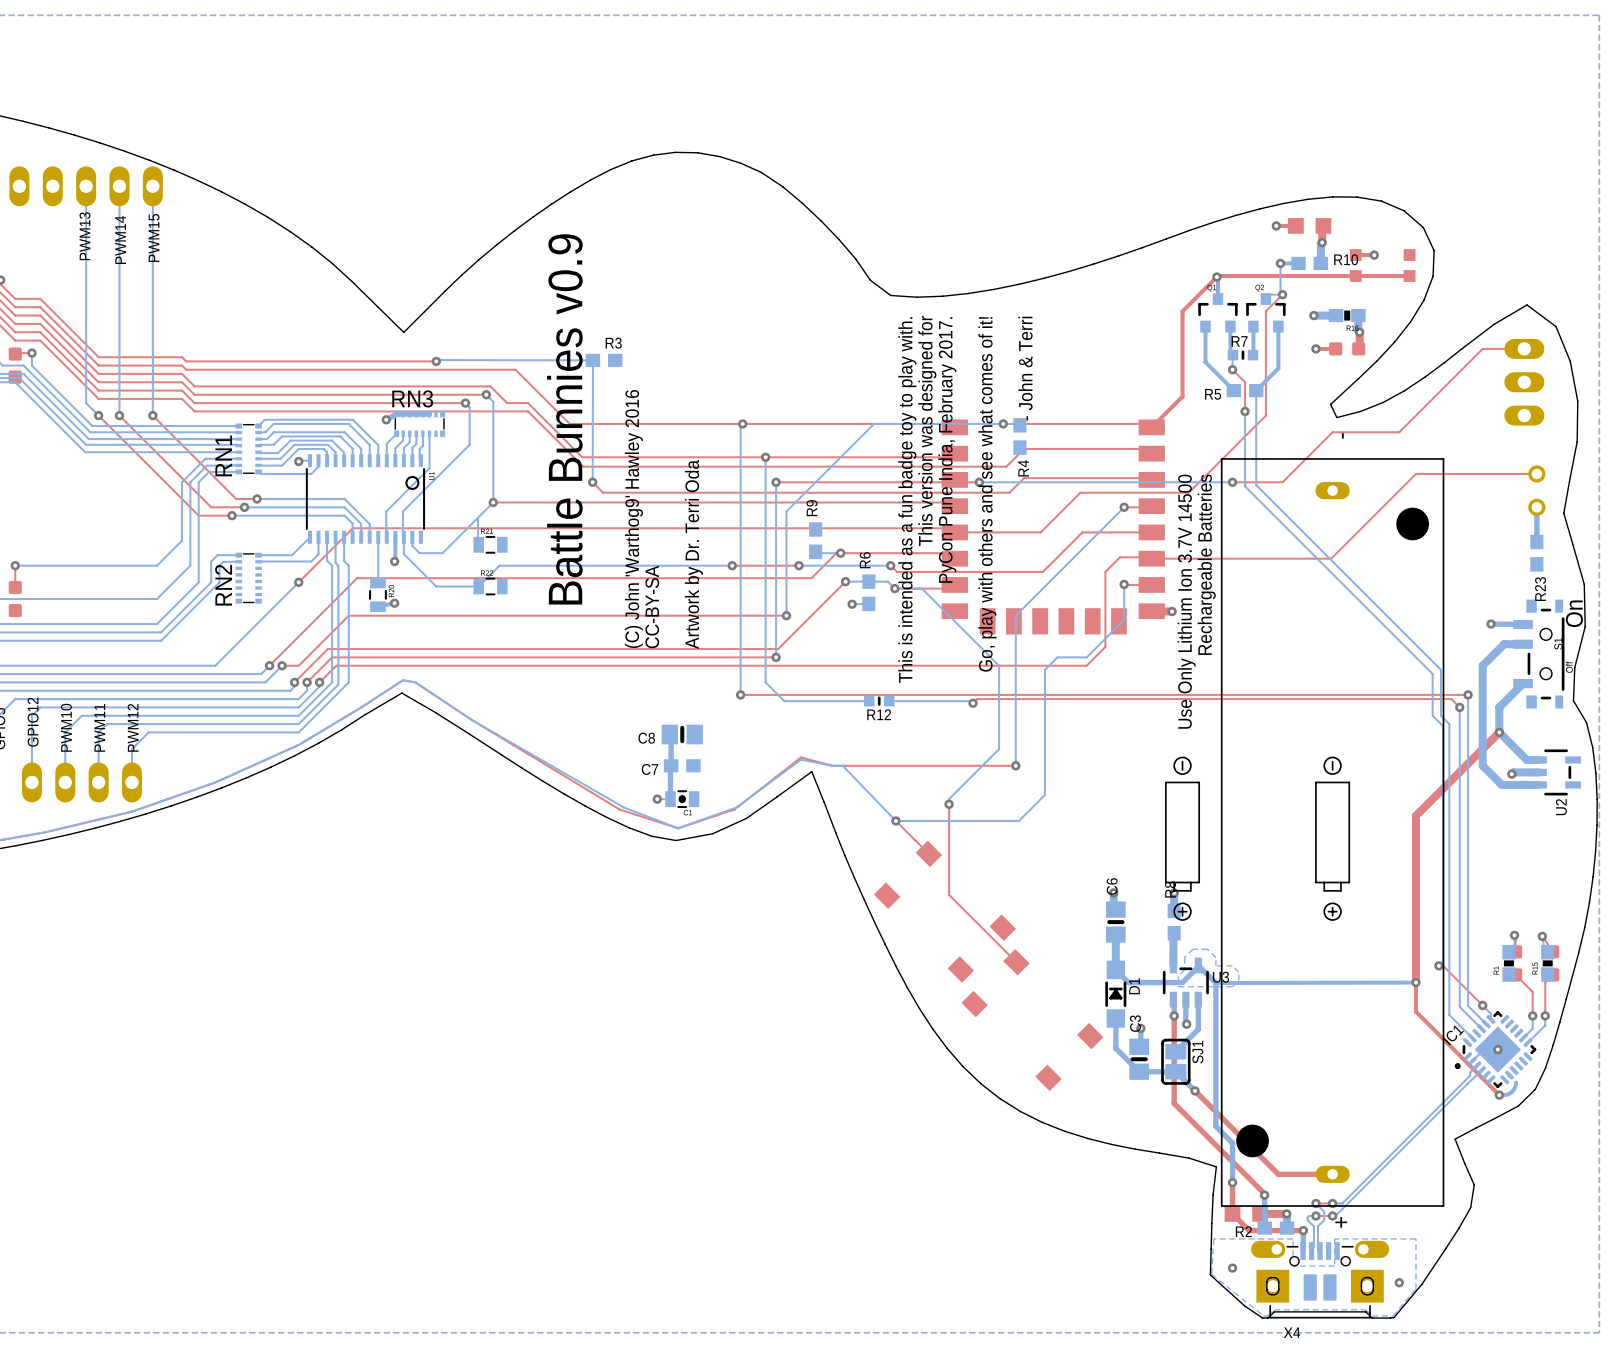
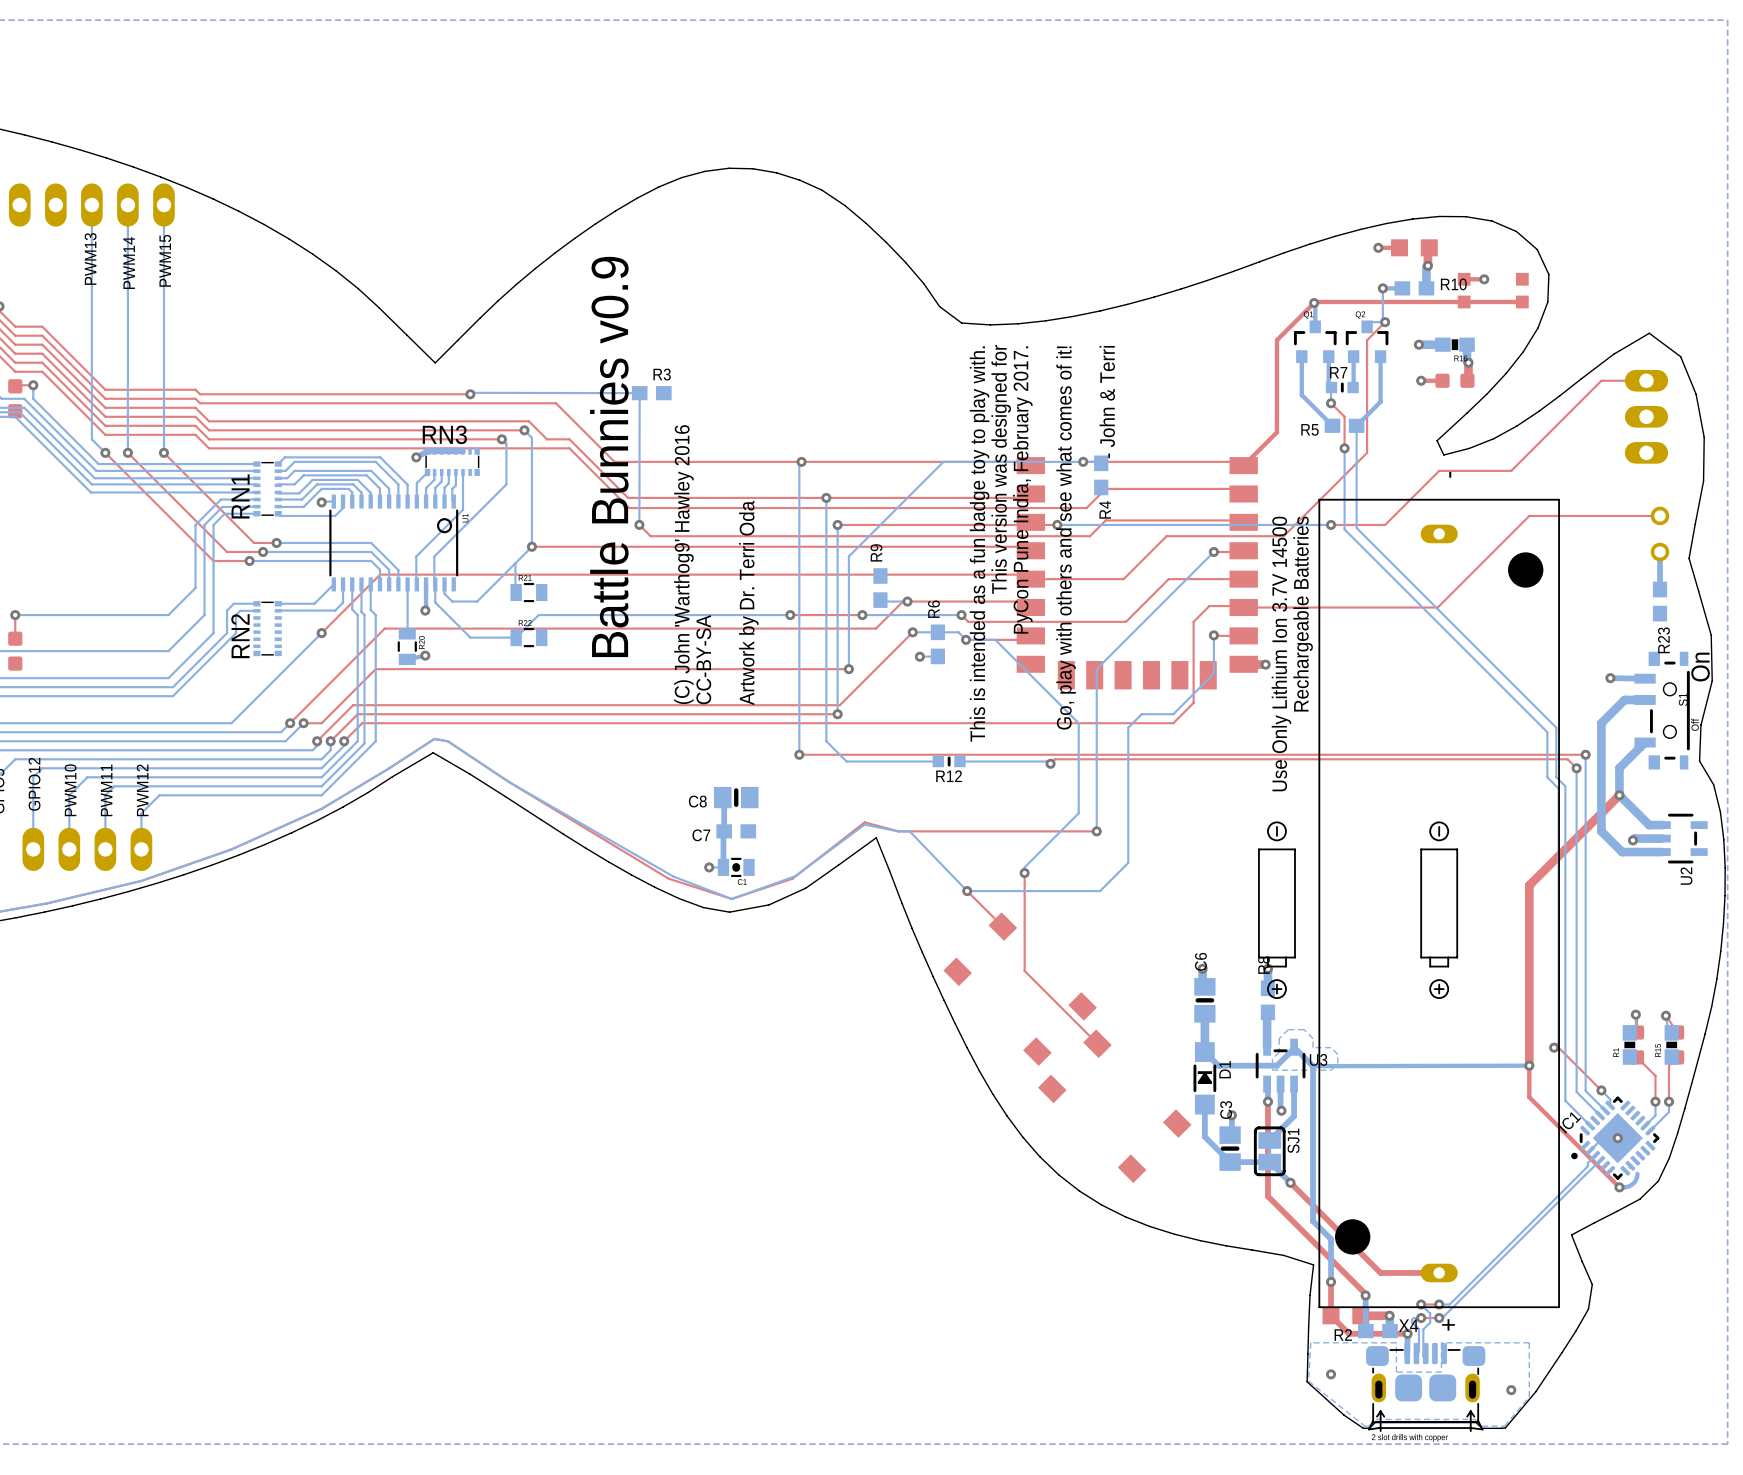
X4 footprint: [1251, 1240, 1390, 1319] -> [1366, 1342, 1486, 1432]
X4 name position: X4 (1292, 1332) -> X4 (1408, 1325)

